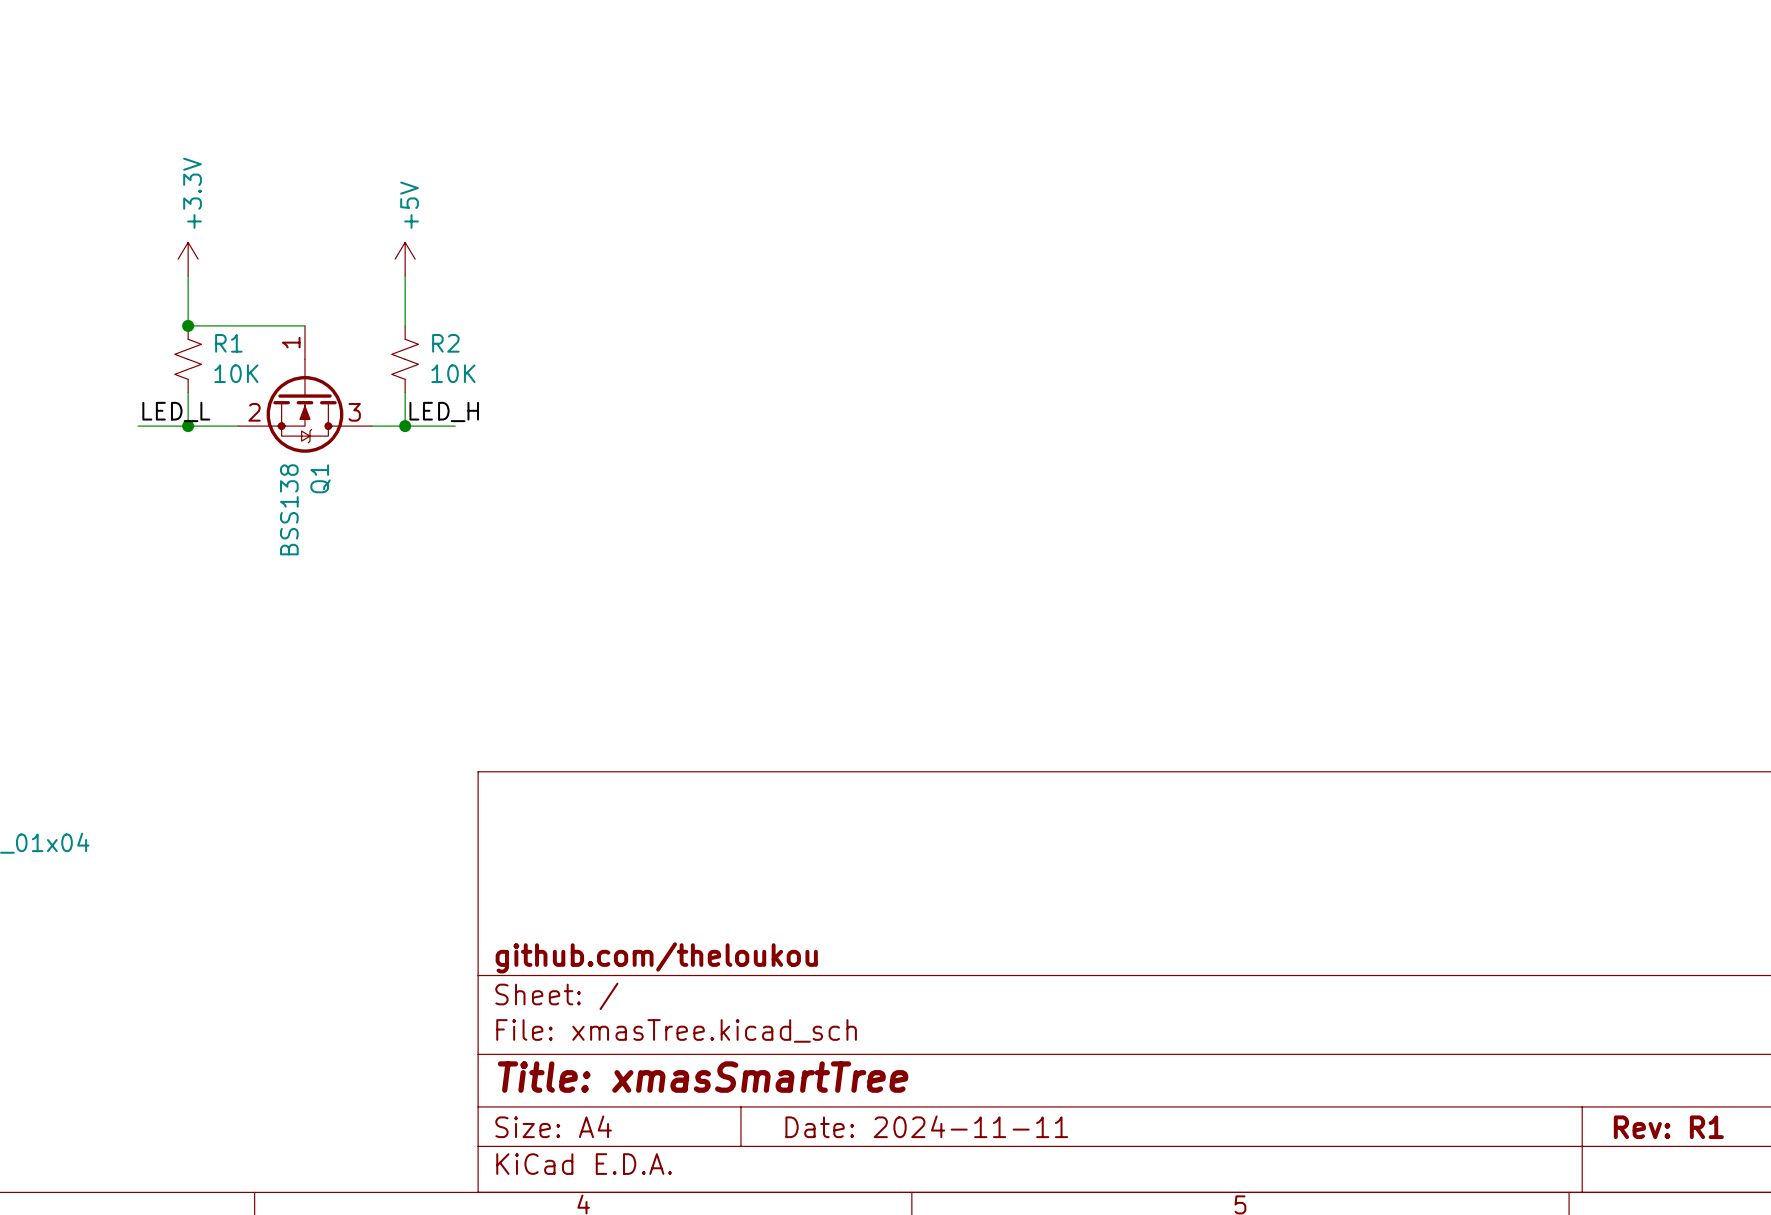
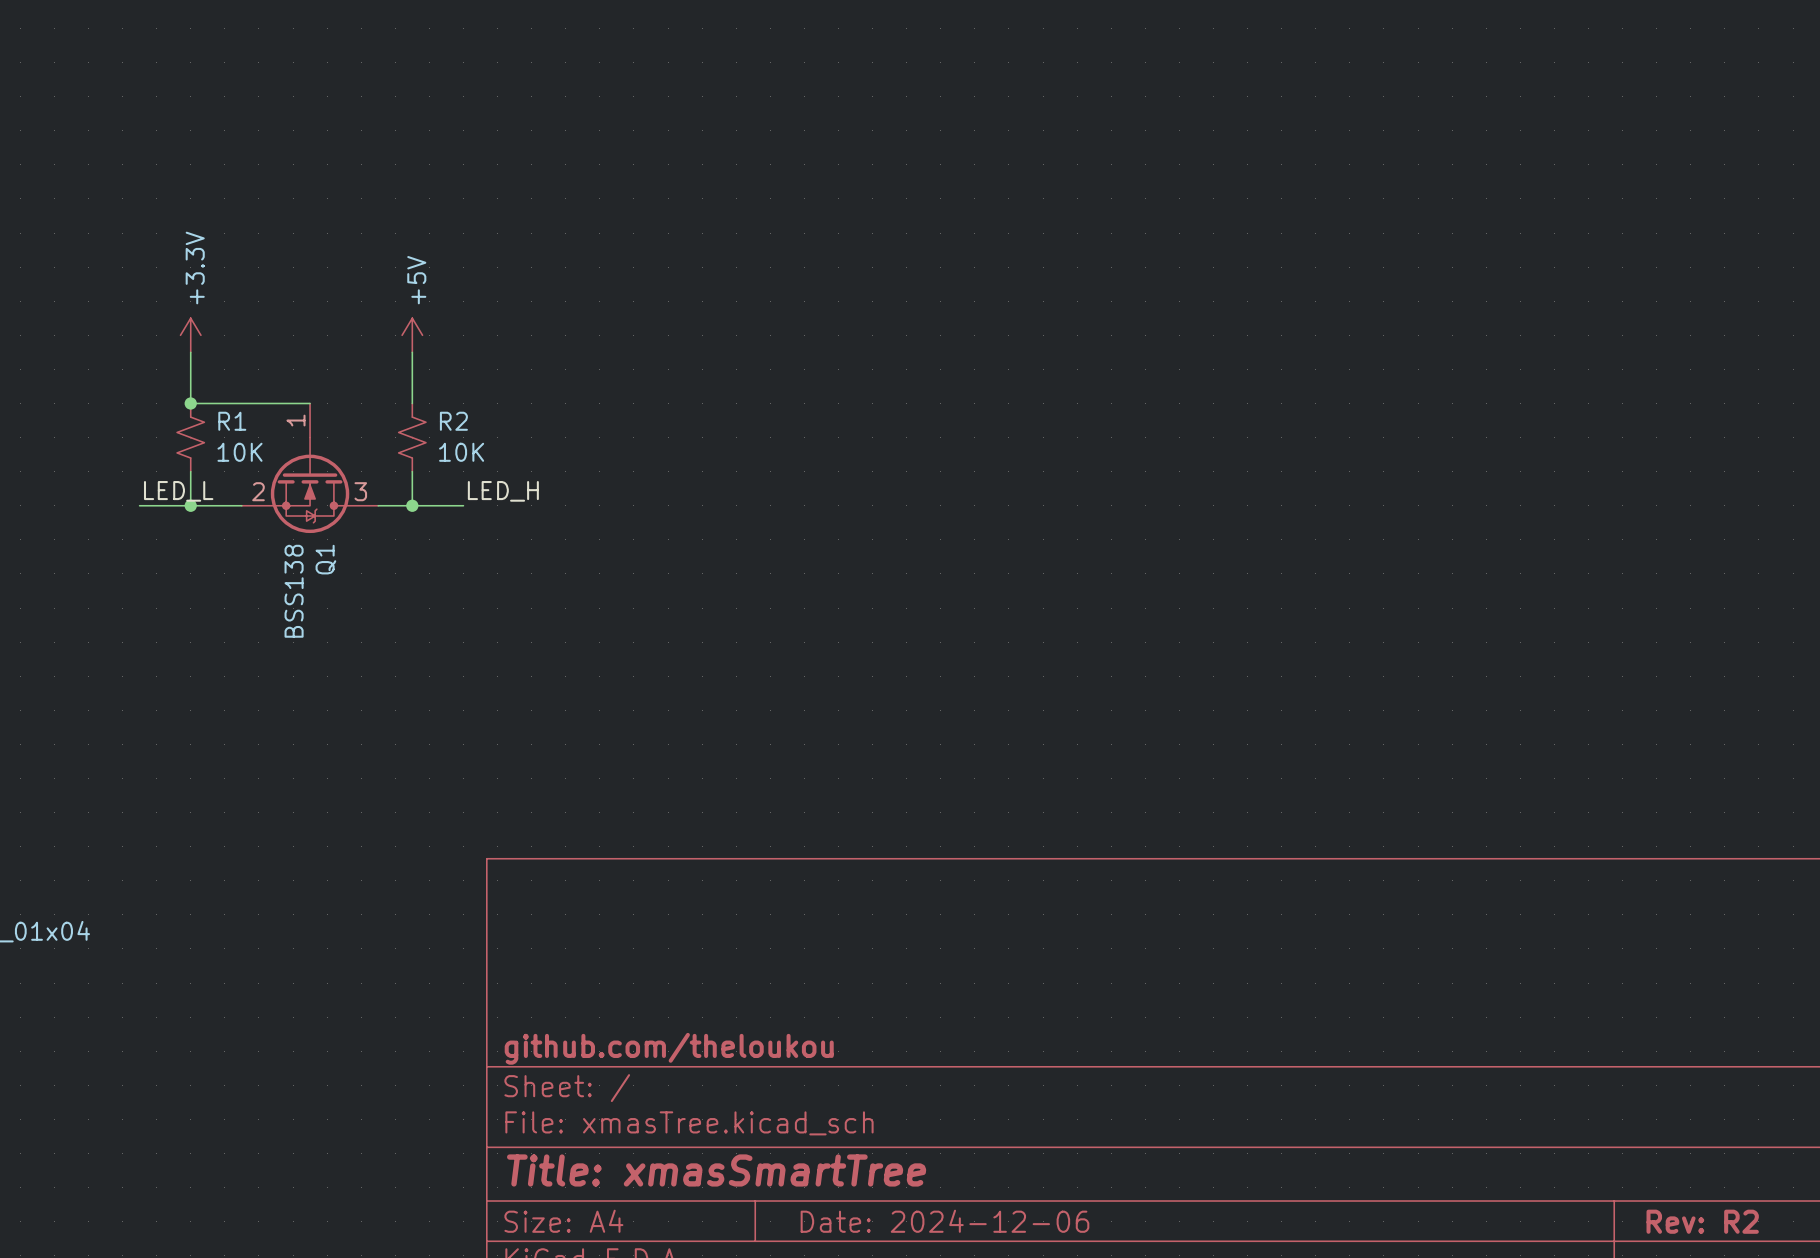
label position: LED_H (444, 411) -> LED_H (503, 491)
title block: Date: 2024-11-11 (926, 1126) -> Date: 2024-12-06 (944, 1221)
title block: Rev: R1 (1668, 1127) -> Rev: R2 (1702, 1221)

